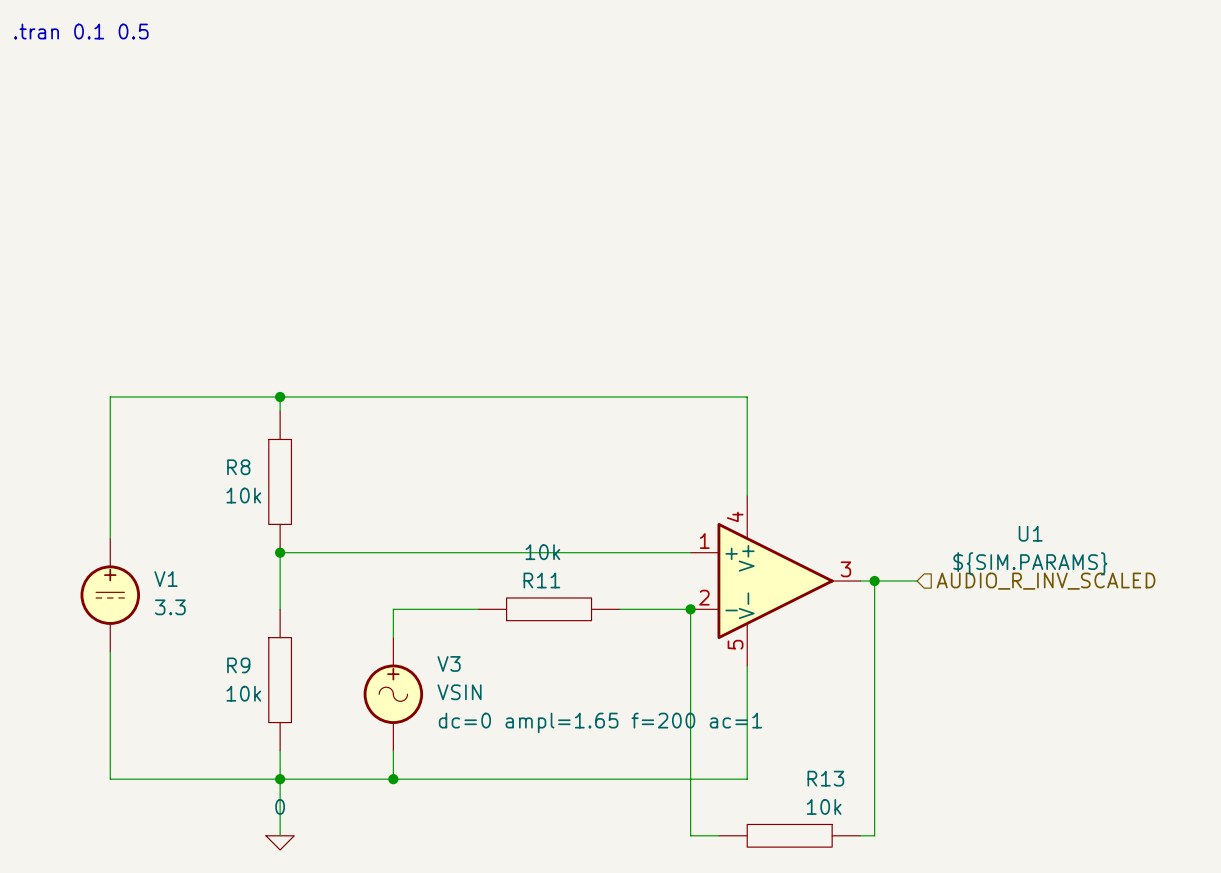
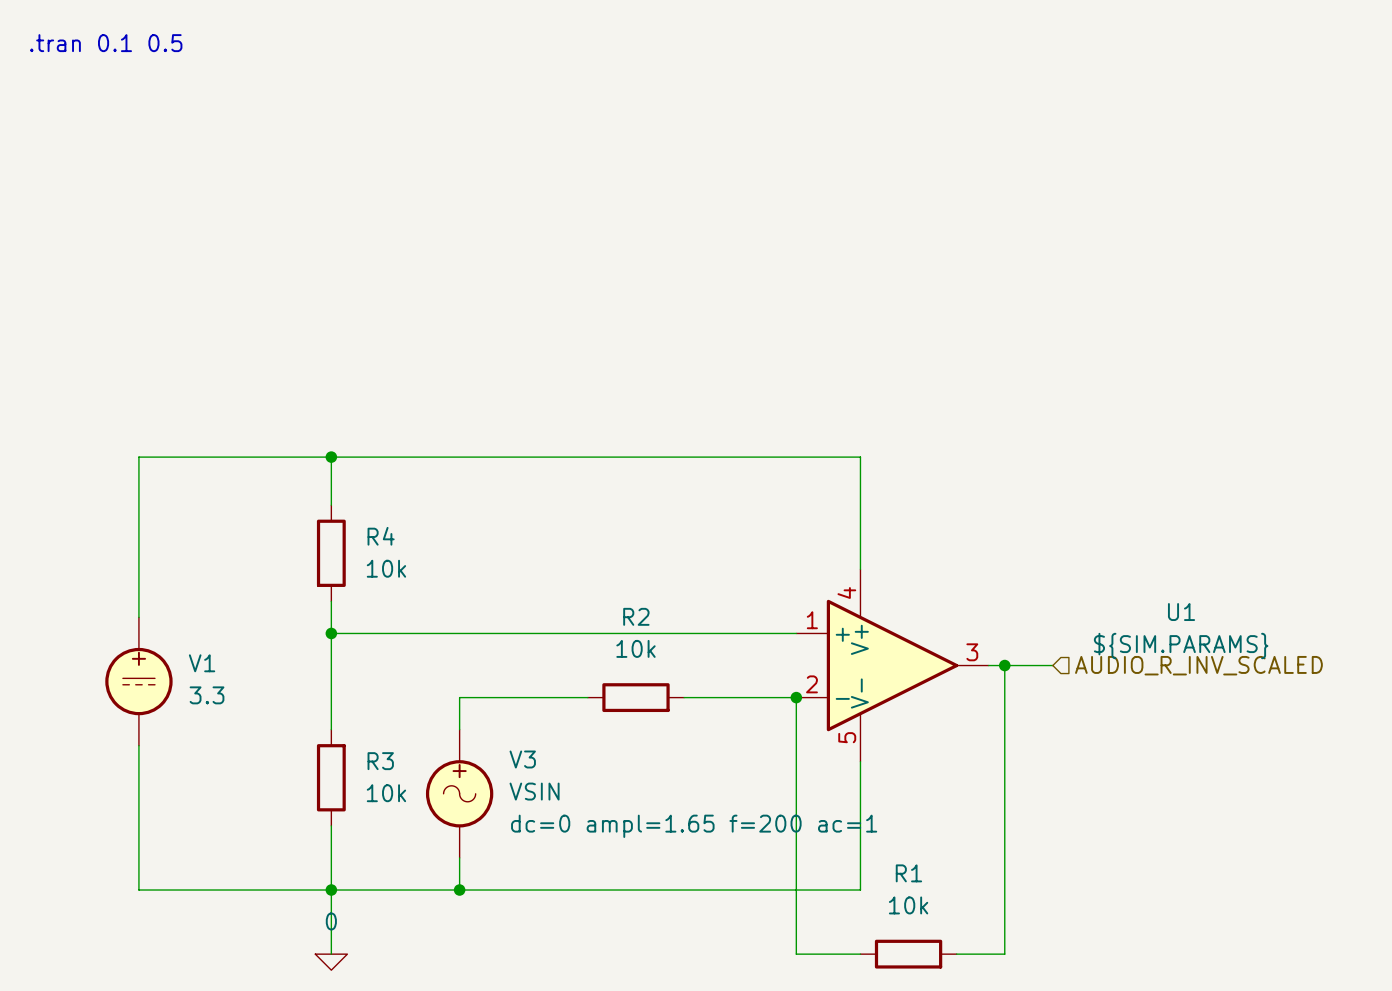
R8: 10k (280, 481) -> none
R4: none -> 10k (331, 553)
R11: 10k (549, 609) -> none
R2: none -> 10k (635, 697)
R9: 10k (280, 680) -> none
R3: none -> 10k (331, 777)
R13: 10k (789, 835) -> none
R1: none -> 10k (908, 954)

